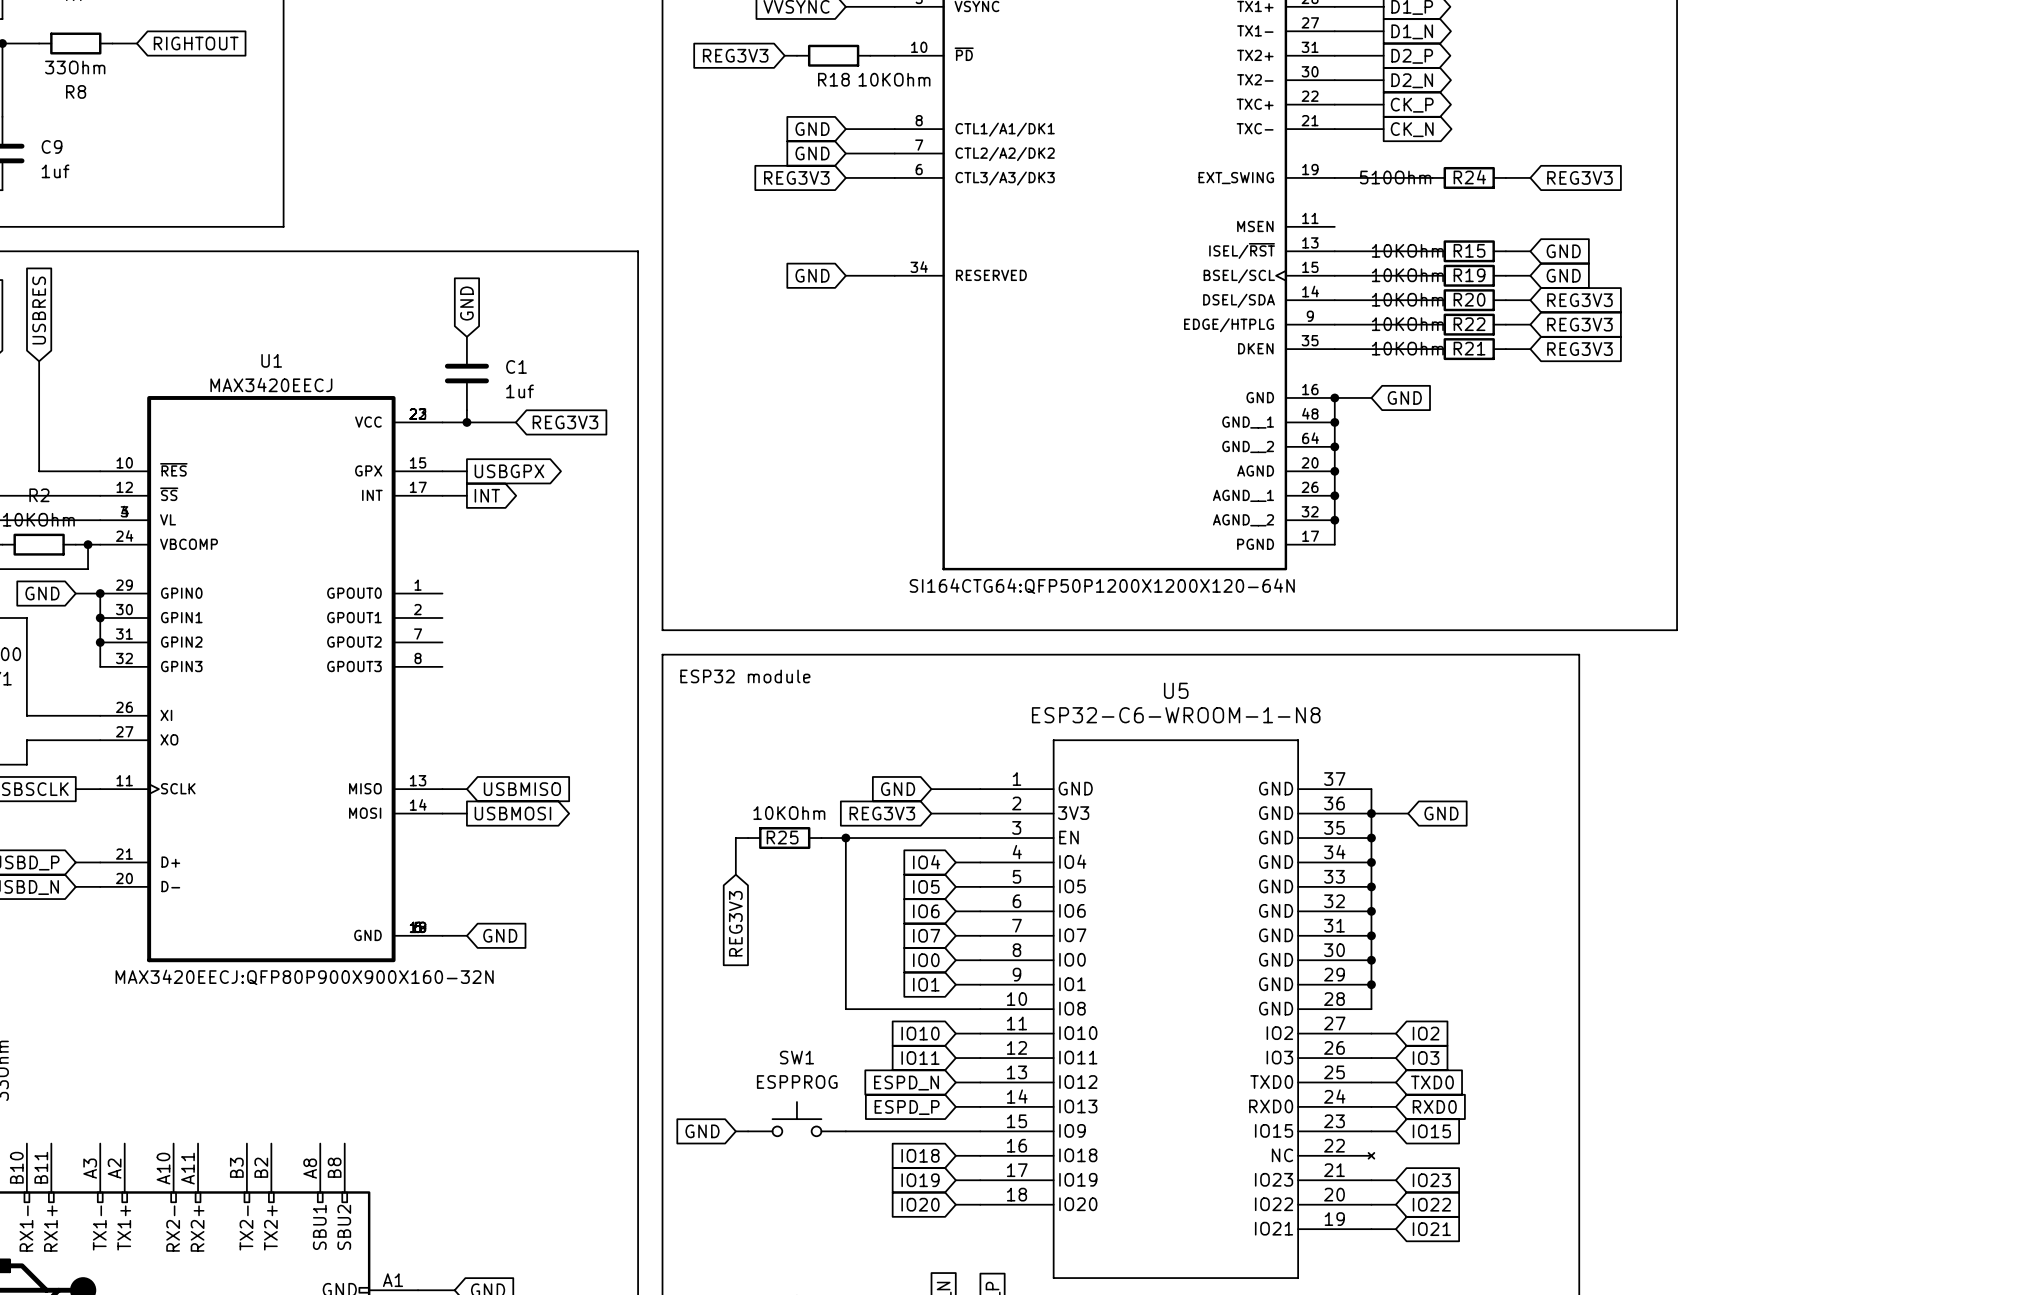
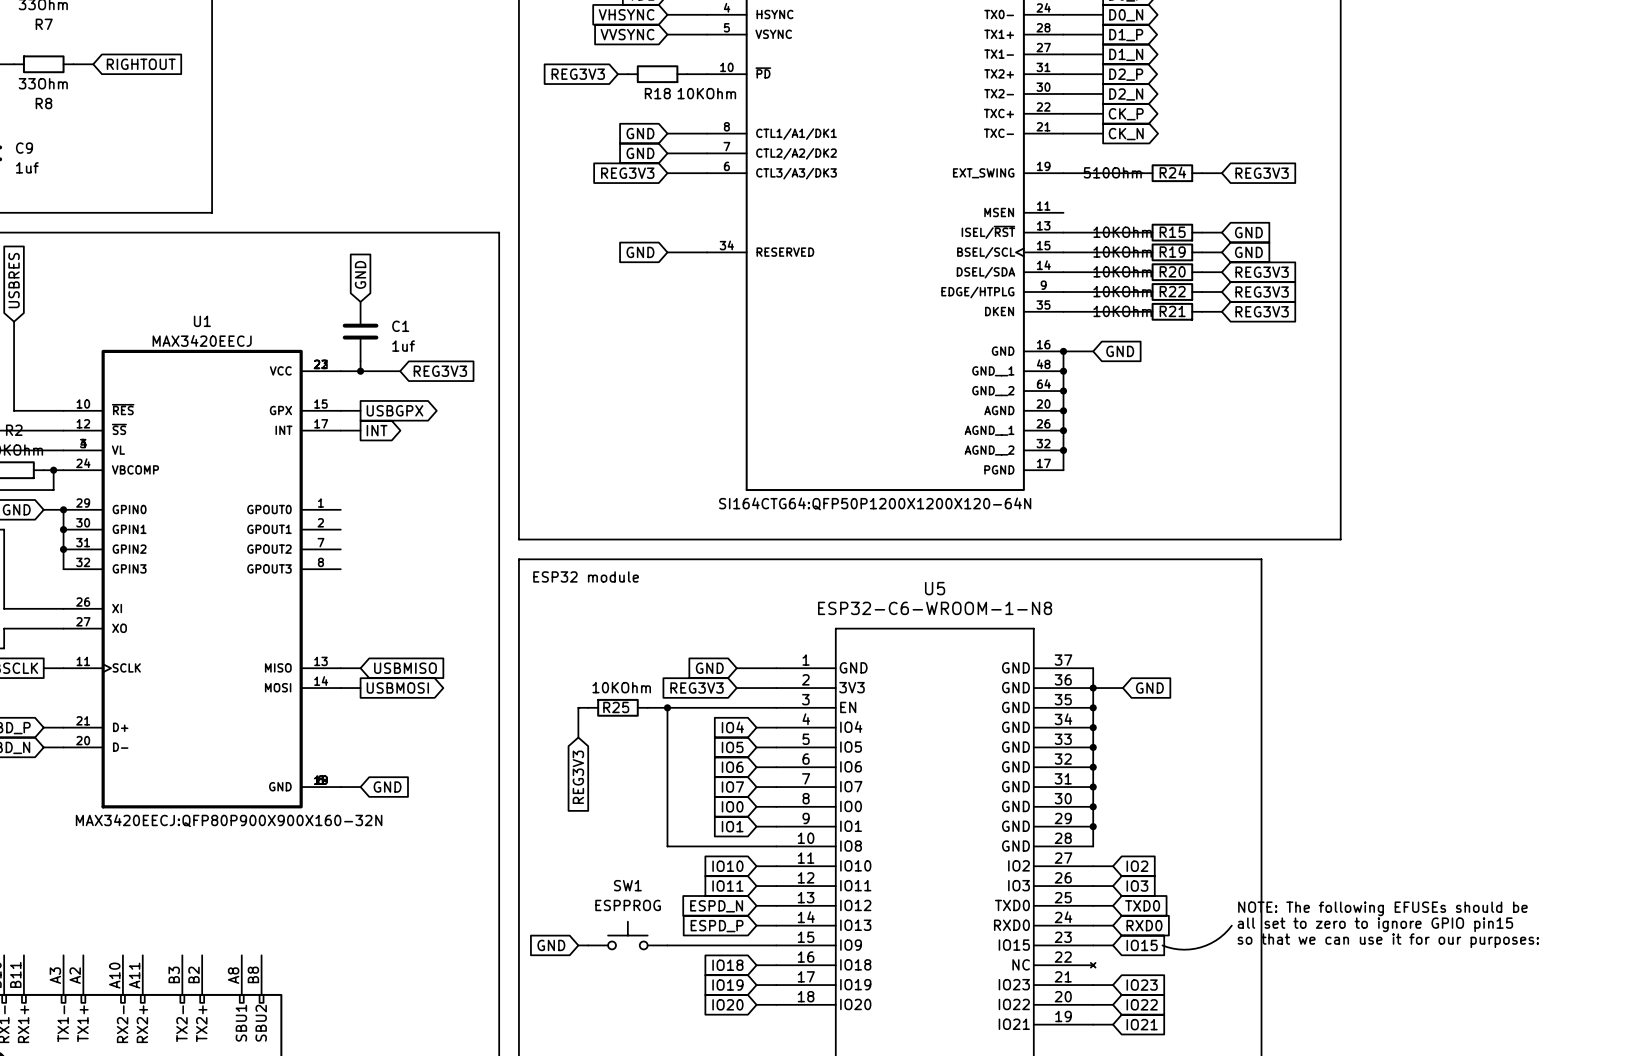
text: none -> NOTE: The following EFUSEs should be (1382, 908)
text: none -> all set to zero to ignore GPIO pin15 (1375, 924)
line: none -> (1231, 925) (1220, 937) (1200, 947) (1178, 949) (1162, 945)
text: none -> so that we can use it for our purposes: (1388, 940)

